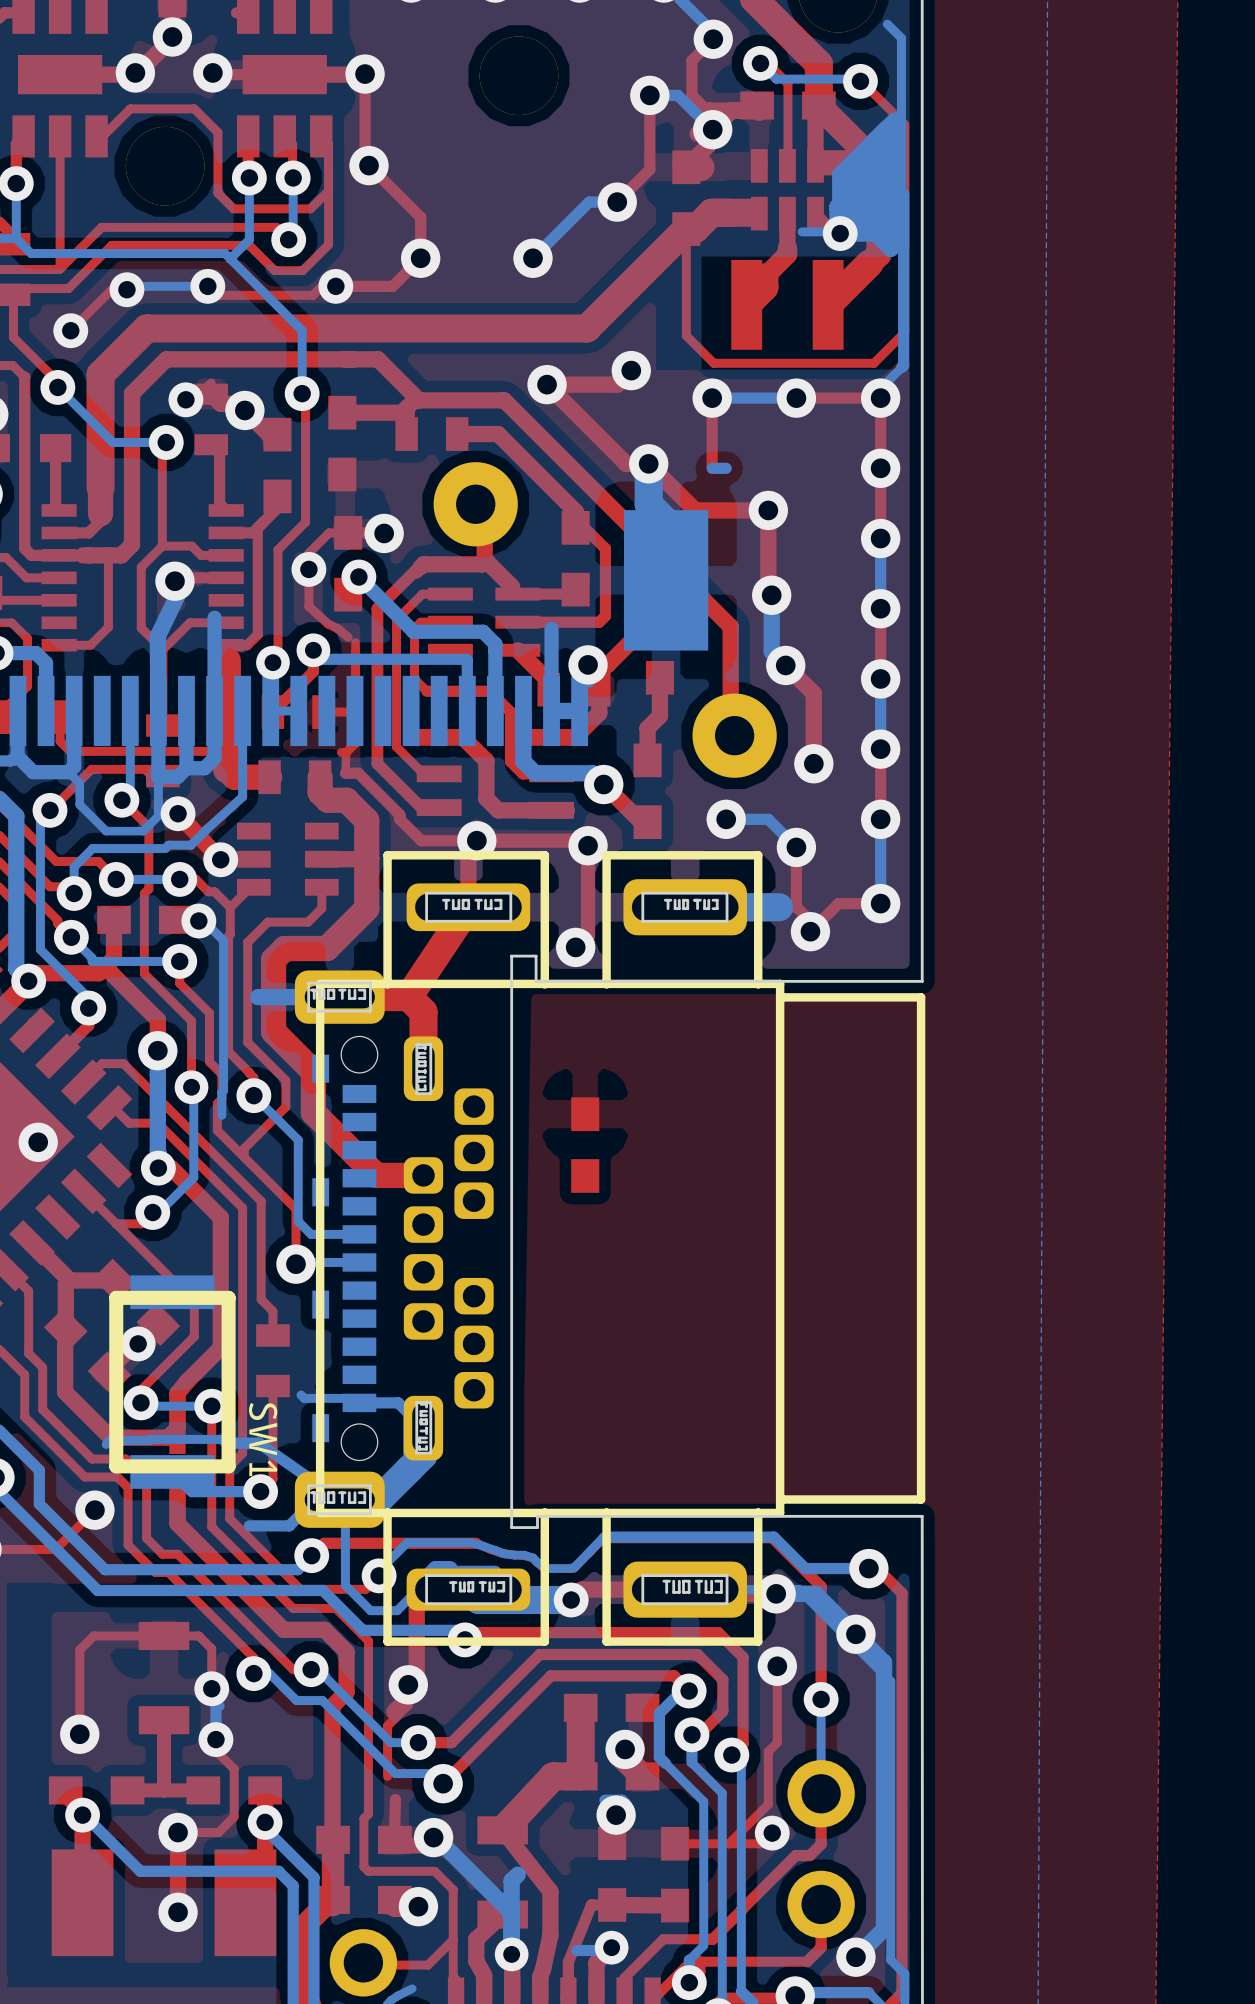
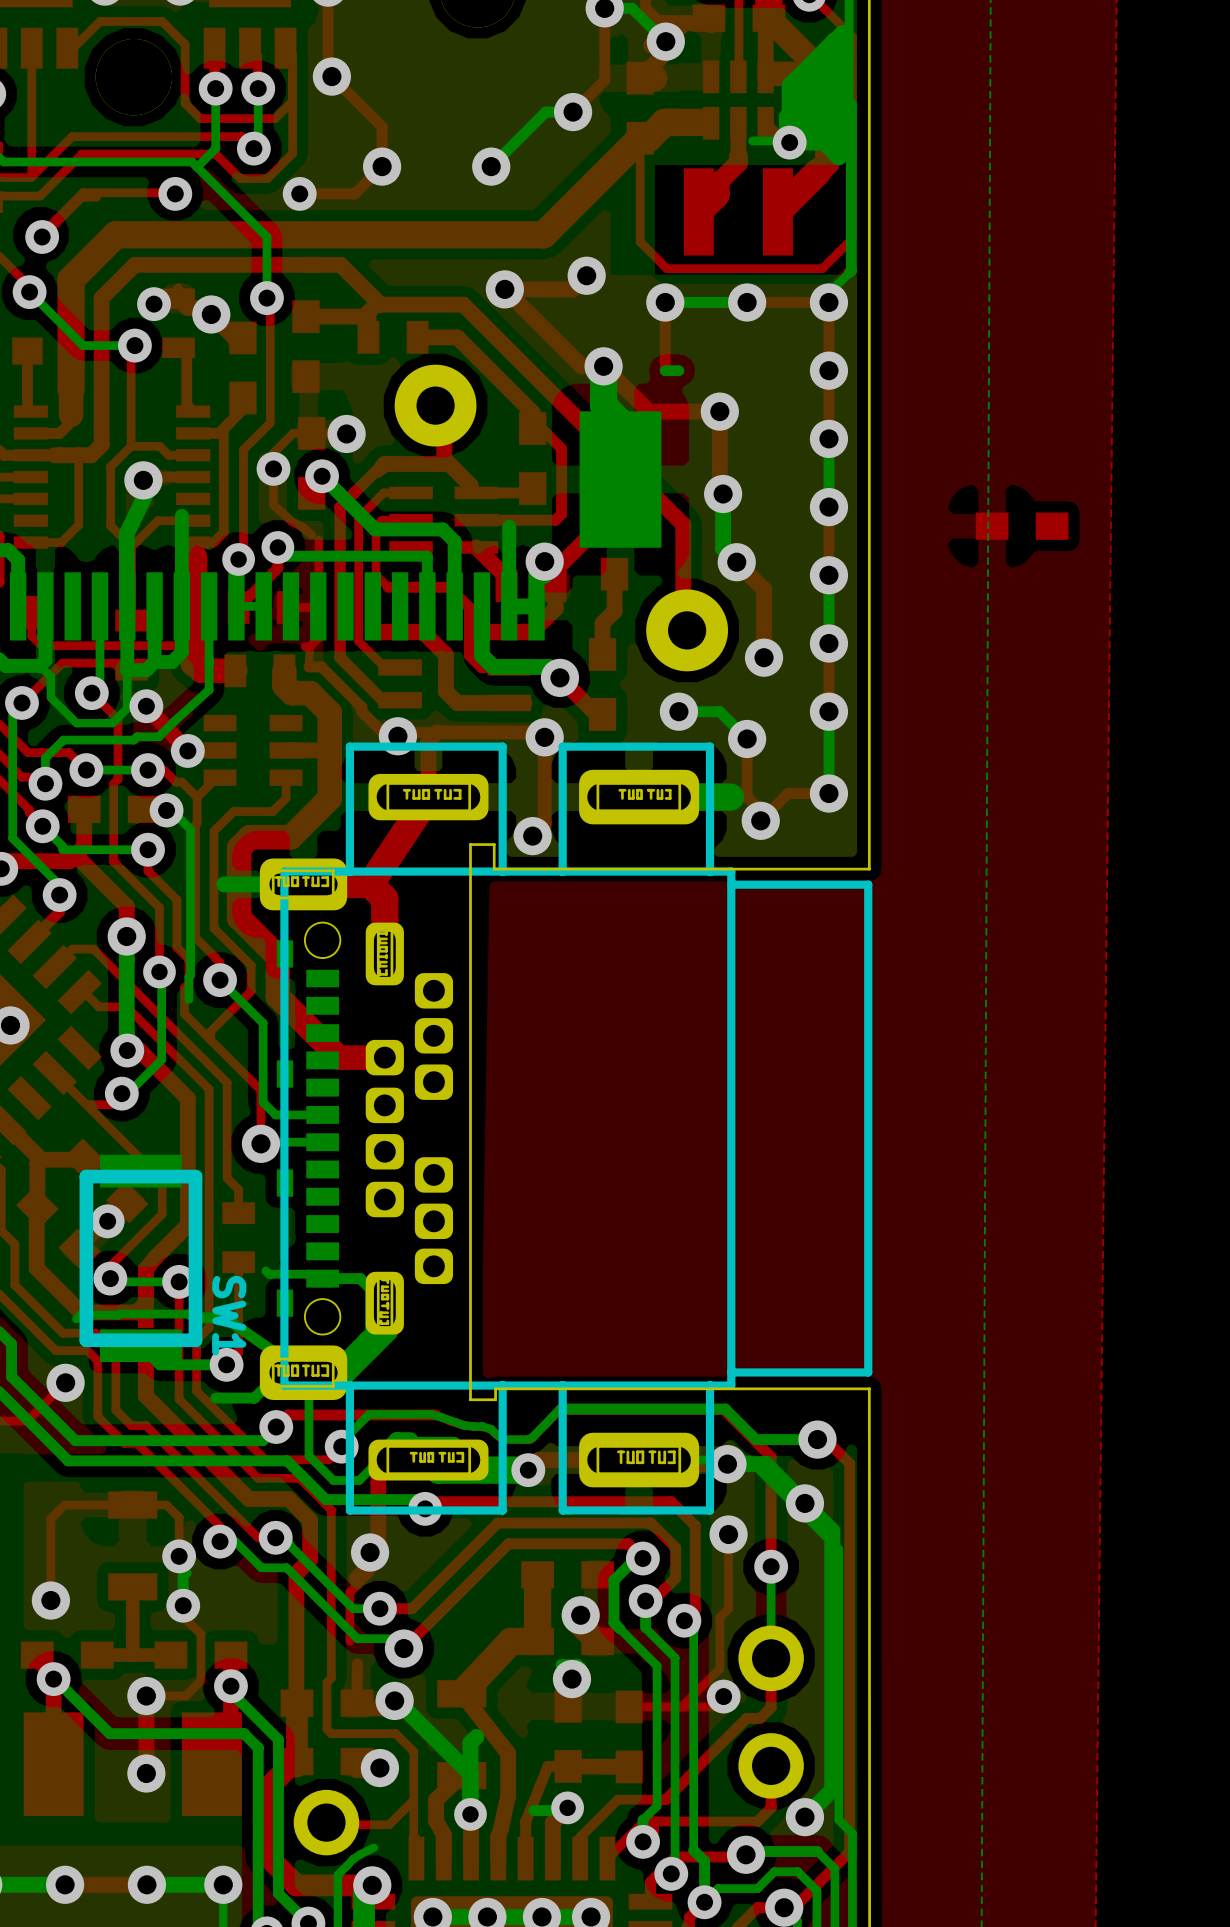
bottom track: (207, 286) (130, 286) (126, 289) -> none
top track: (335, 286) (321, 286) (312, 295) (216, 295) (207, 286) -> none
top track: none -> (178, 195) (175, 192) (83, 192) (41, 234)
via: (126, 289) -> none
via position: (476, 840) -> (397, 736)
part rotation: 0° (585, 1145) -> 90° clockwise (1022, 526)
part position: (585, 1145) -> (1022, 526)

